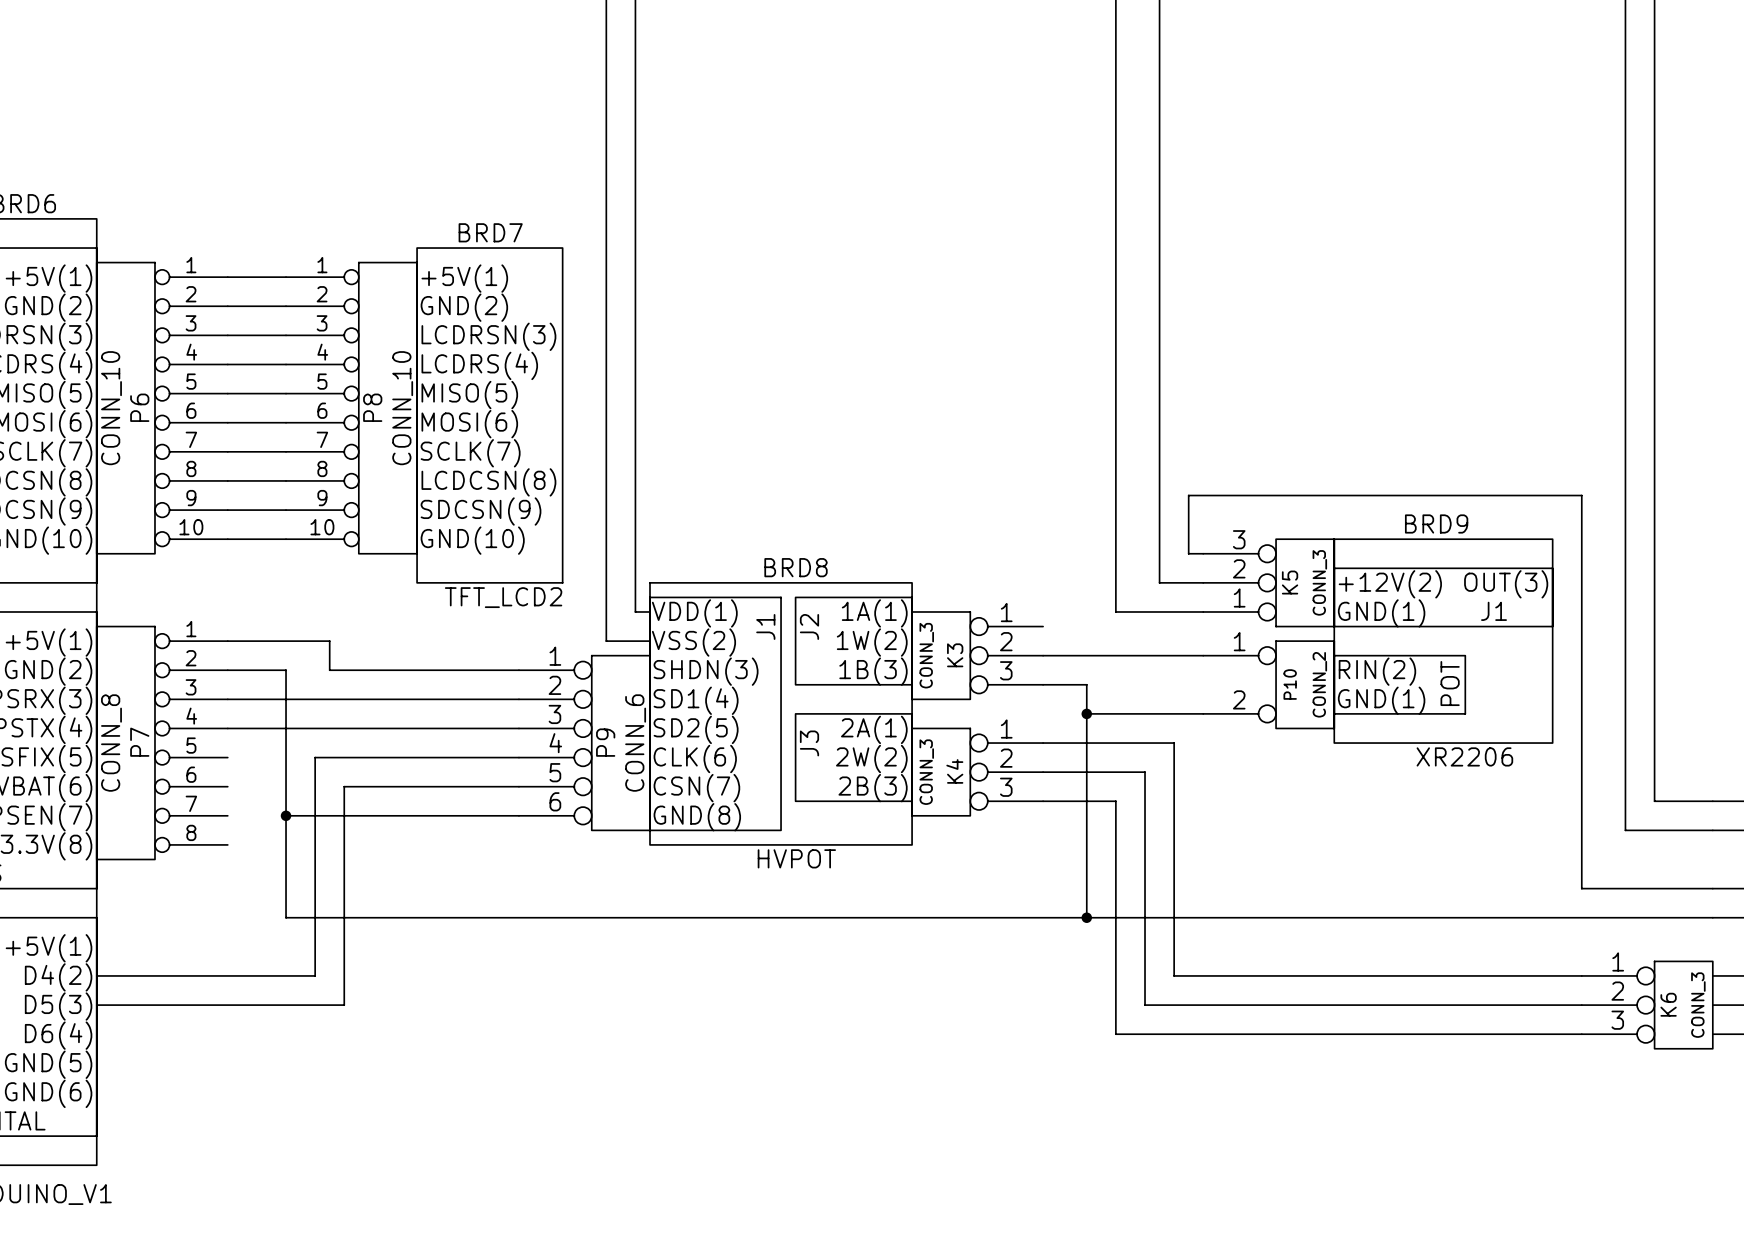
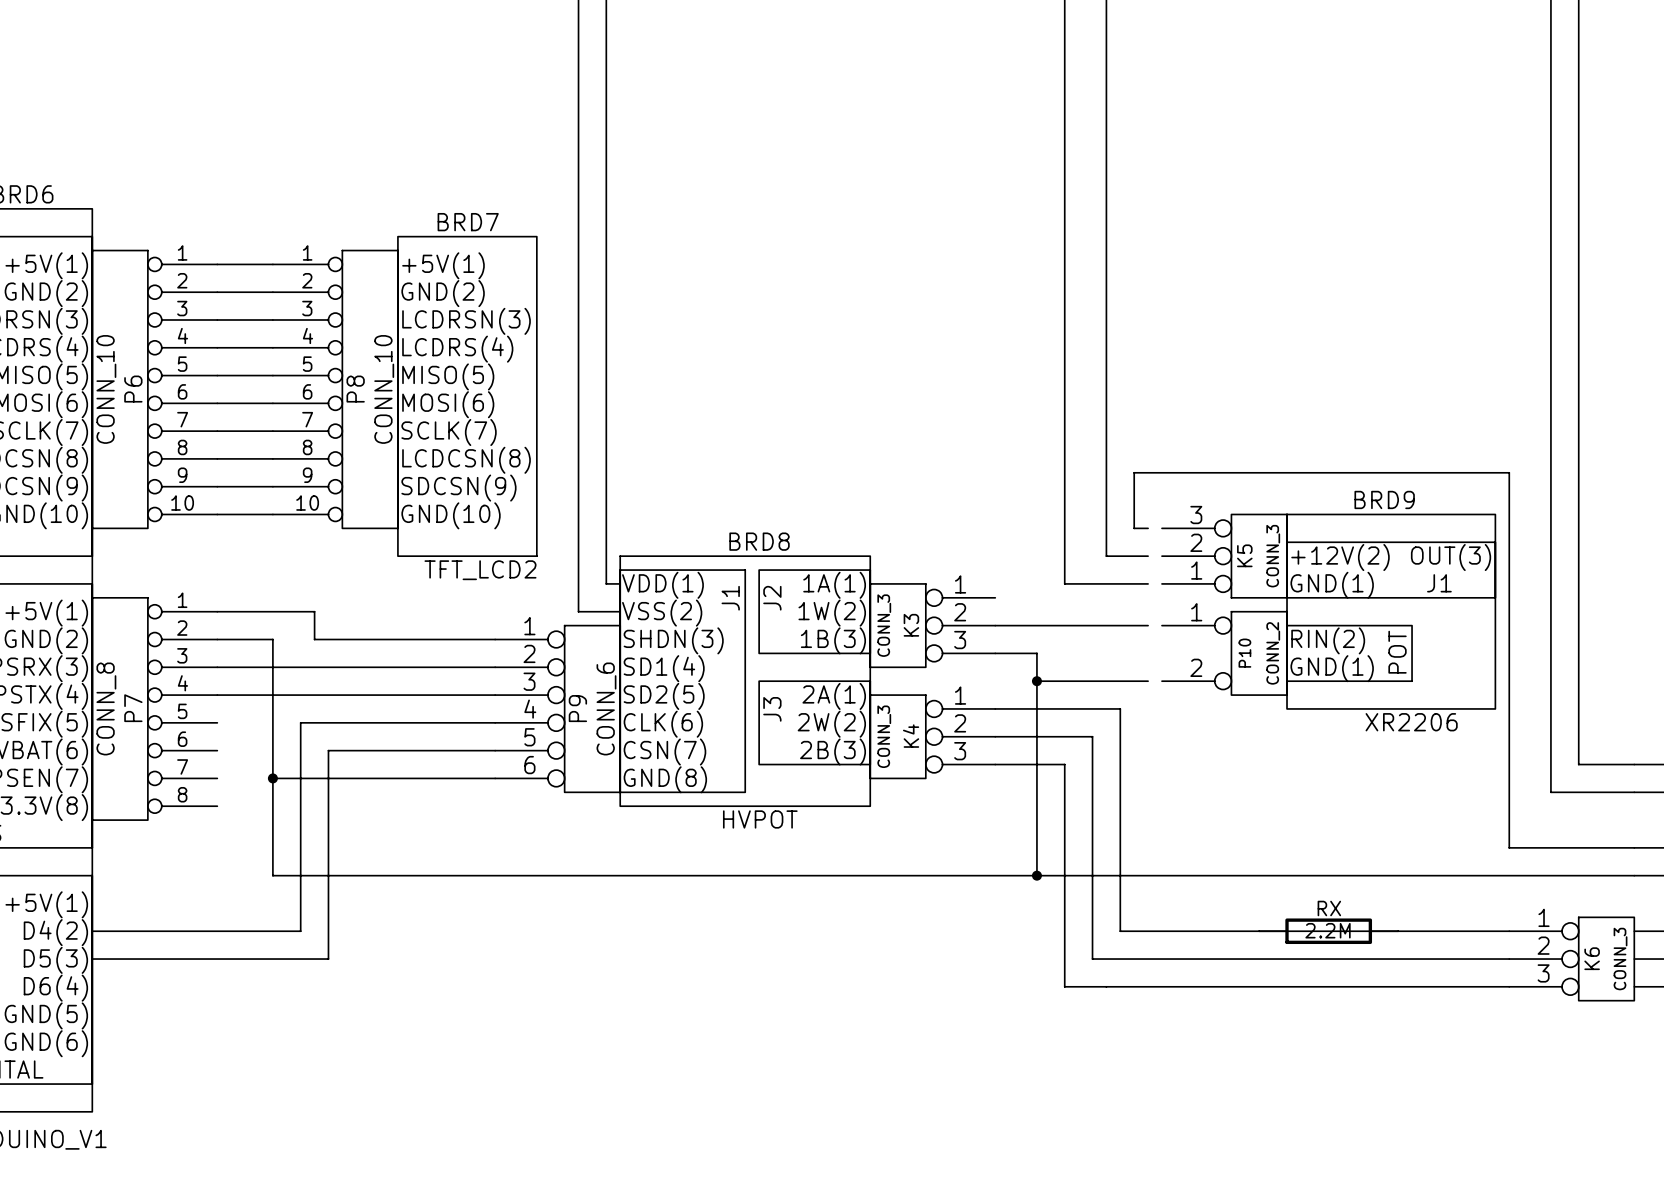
K5 position: (1268, 582) -> (1224, 556)
BRD9 position: (1443, 641) -> (1391, 611)
P10 position: (1268, 684) -> (1224, 653)
RX: none -> 2.2M (1328, 931)

